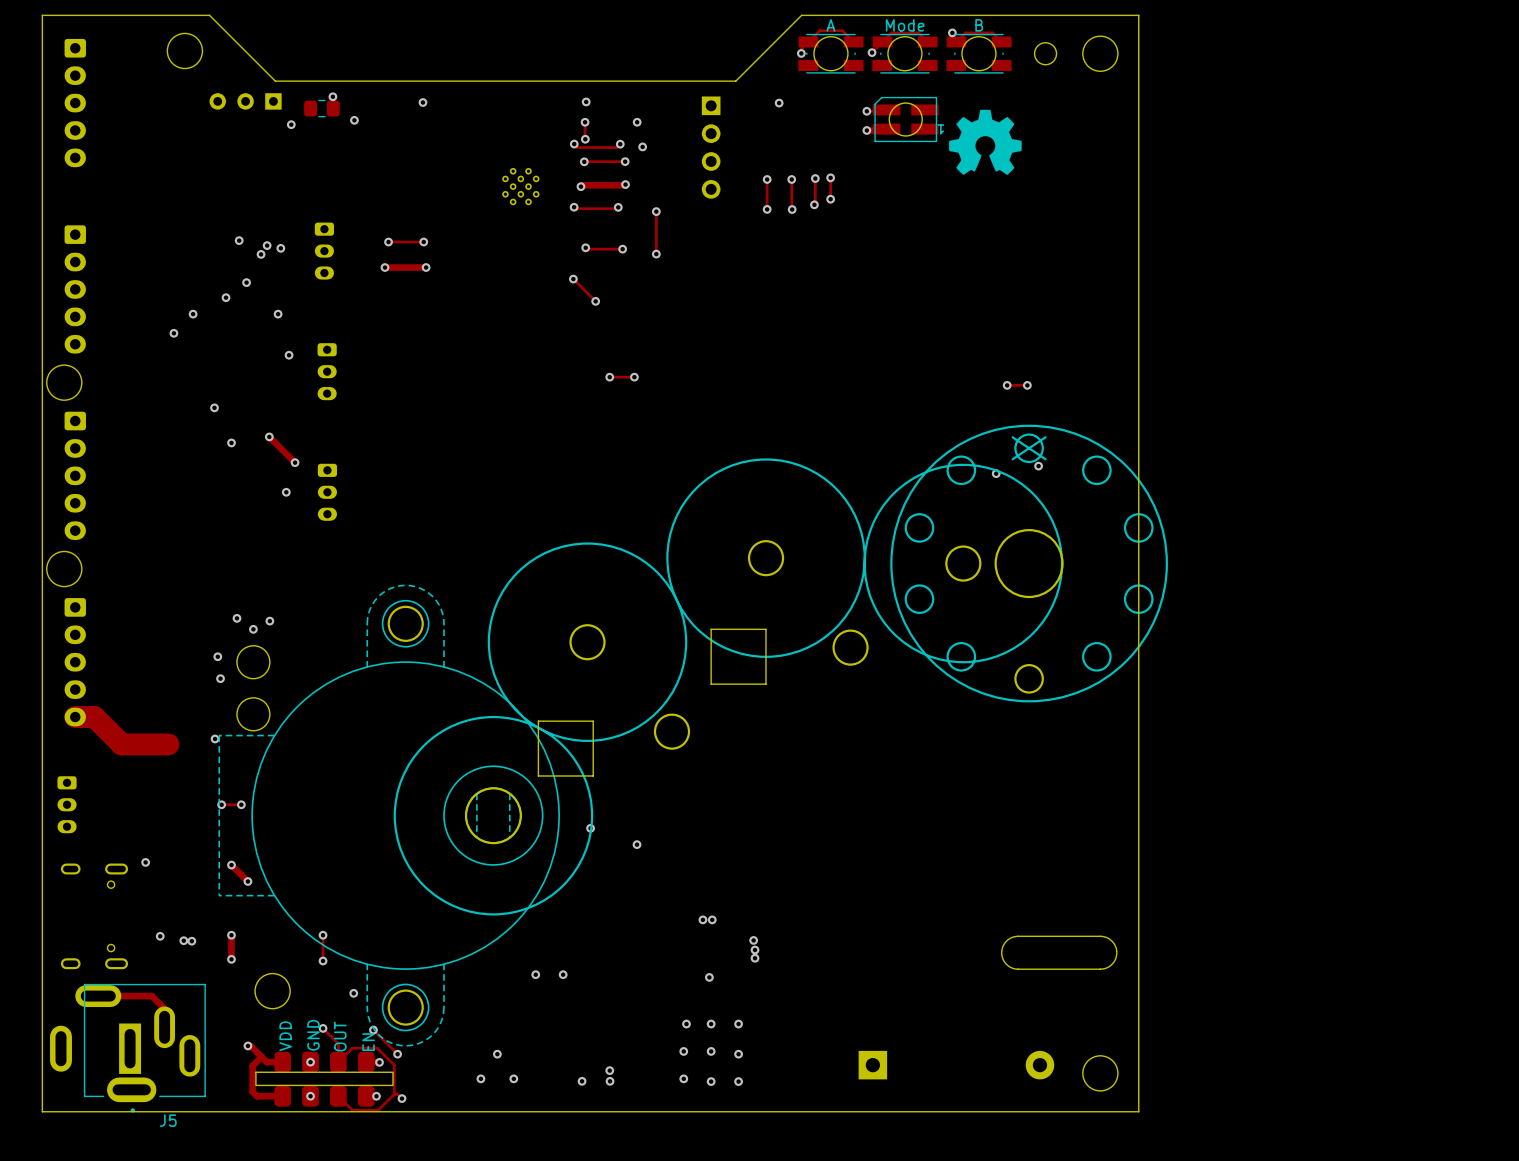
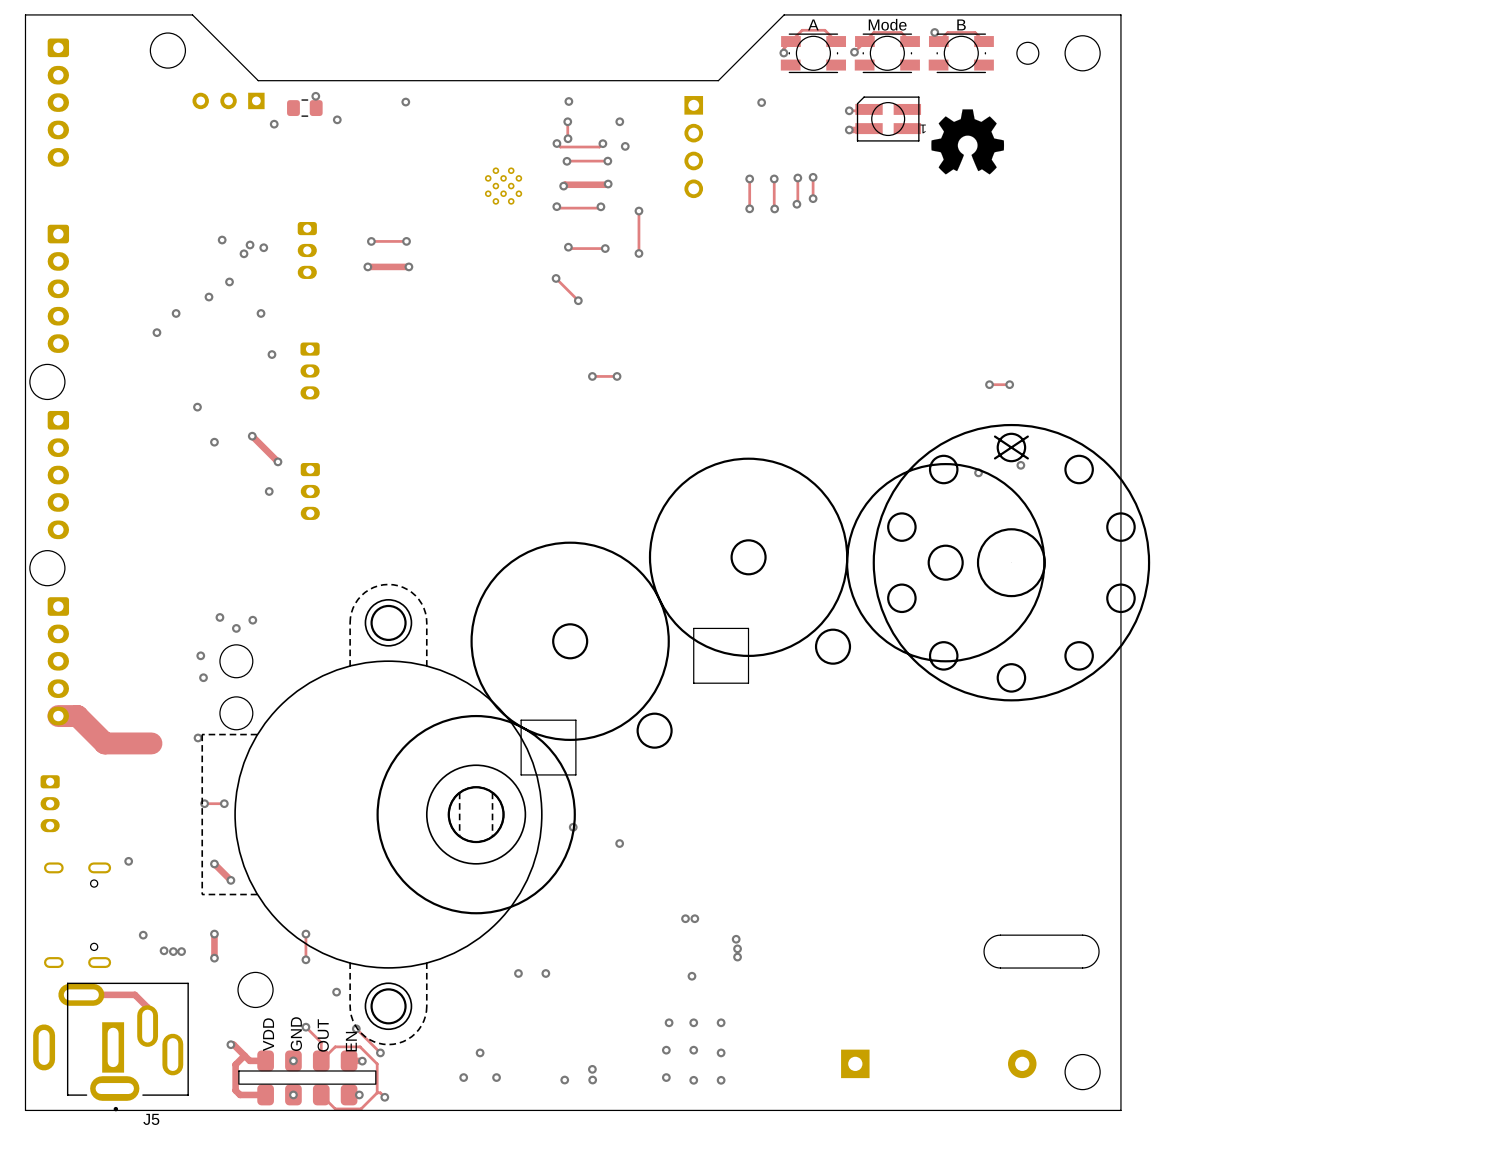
via: (183, 940) -> none
via: (191, 941) -> none
via: none -> (164, 950)
via: none -> (173, 951)
via: none -> (181, 951)

